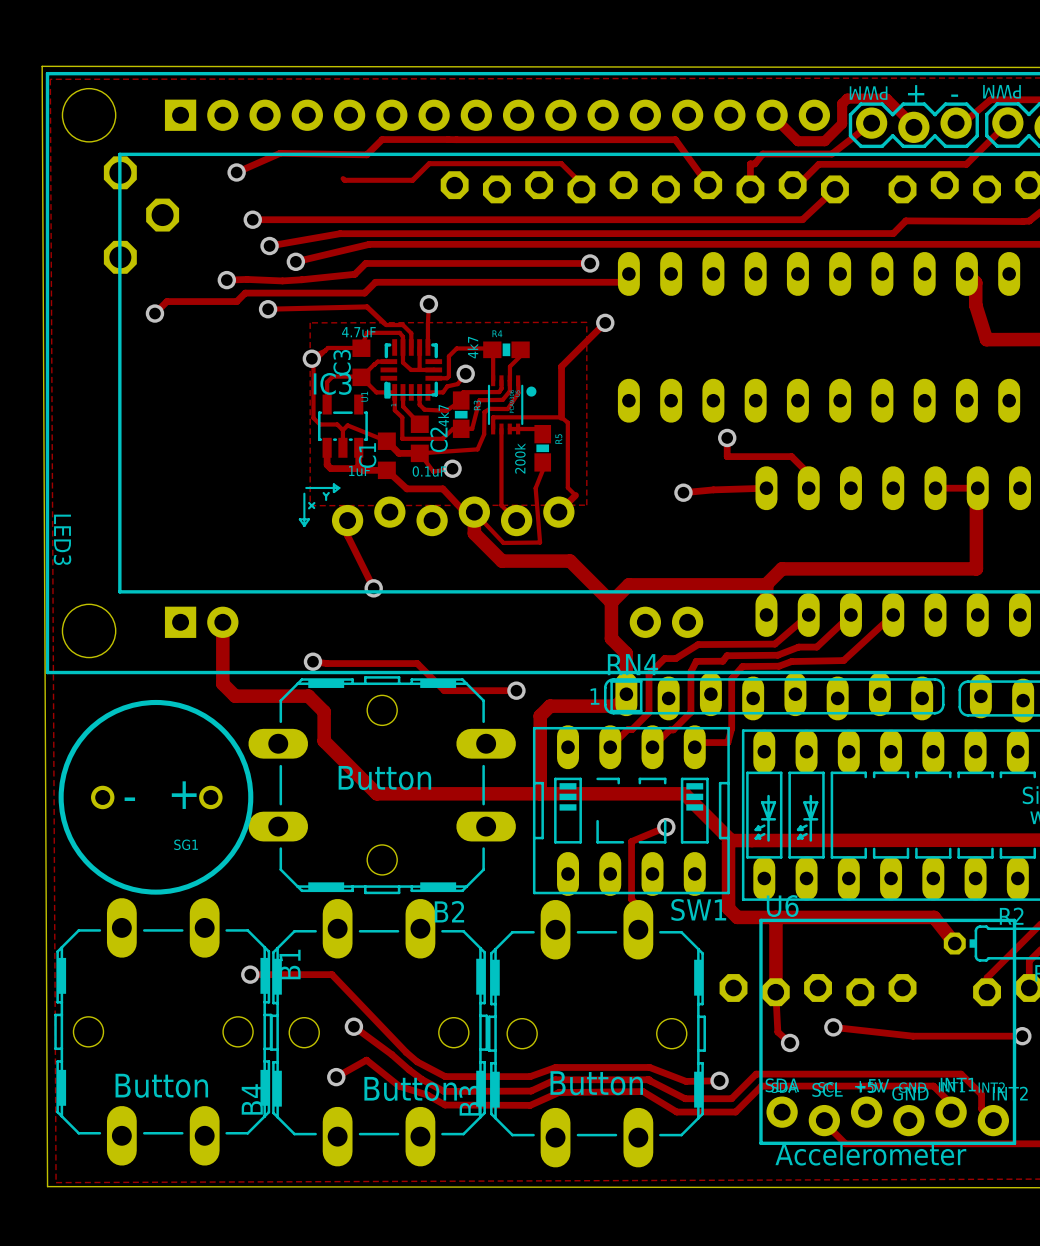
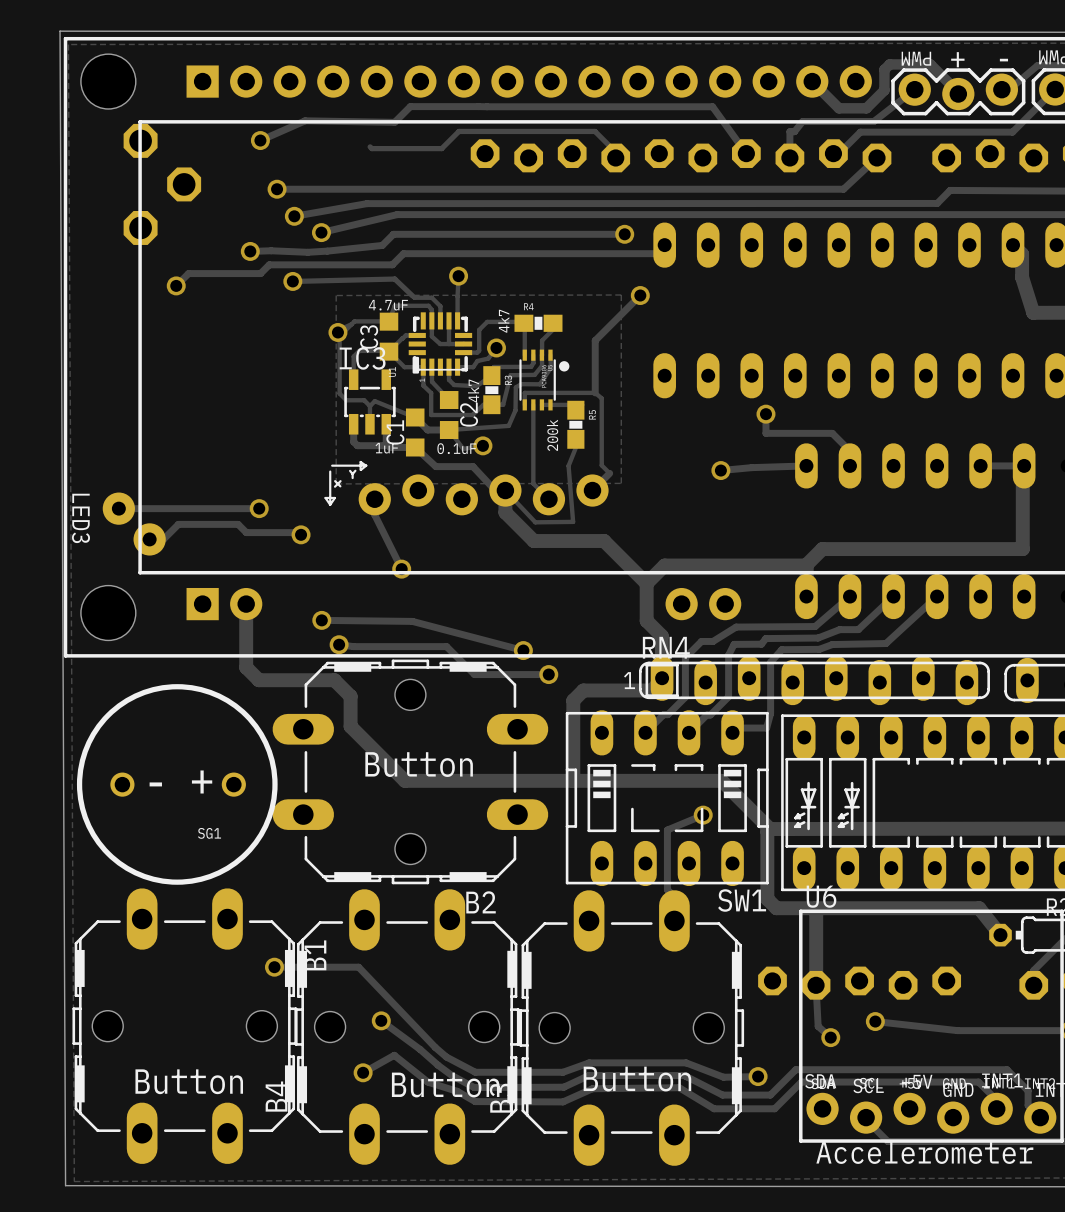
track: none -> (118, 508) (259, 508)
via: none -> (259, 508)
part: none -> (134, 524)
track: none -> (301, 534) (298, 532) (246, 532) (238, 524) (178, 524) (163, 539) (149, 539)
via: none -> (301, 534)
track: none -> (321, 620) (412, 621) (523, 650)
via: none -> (321, 620)
via: none -> (523, 650)

